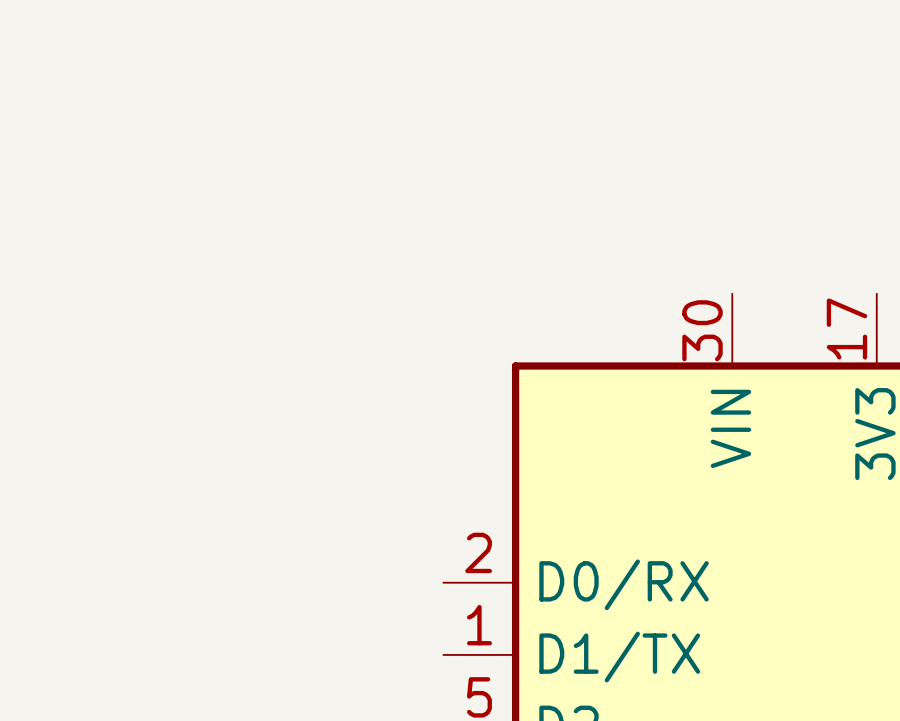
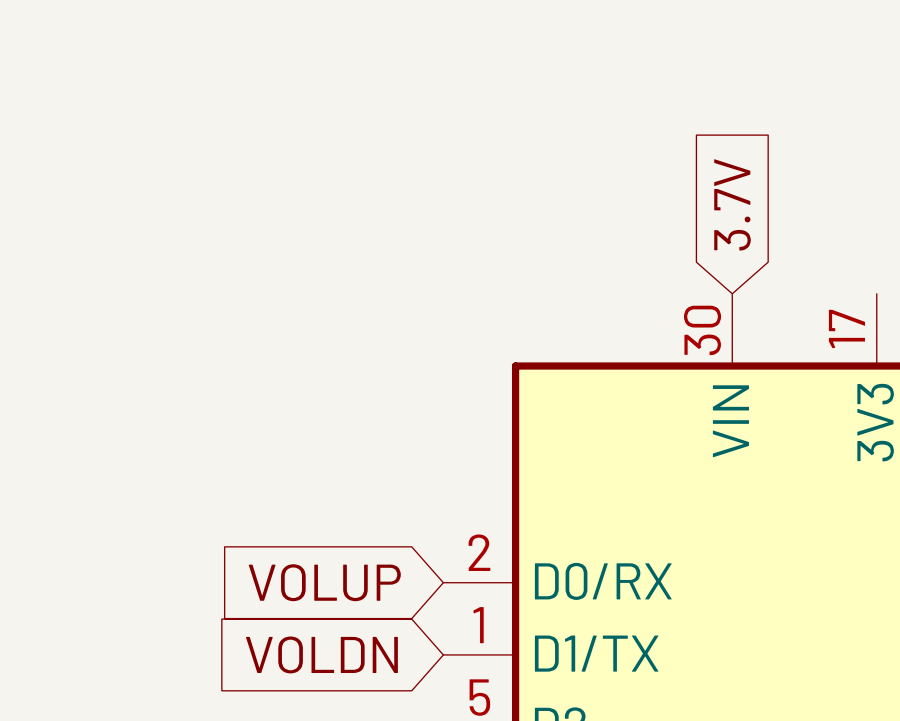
global label: none -> 3.7V (732, 204)
global label: none -> VOLUP (324, 582)
global label: none -> VOLDN (321, 654)

